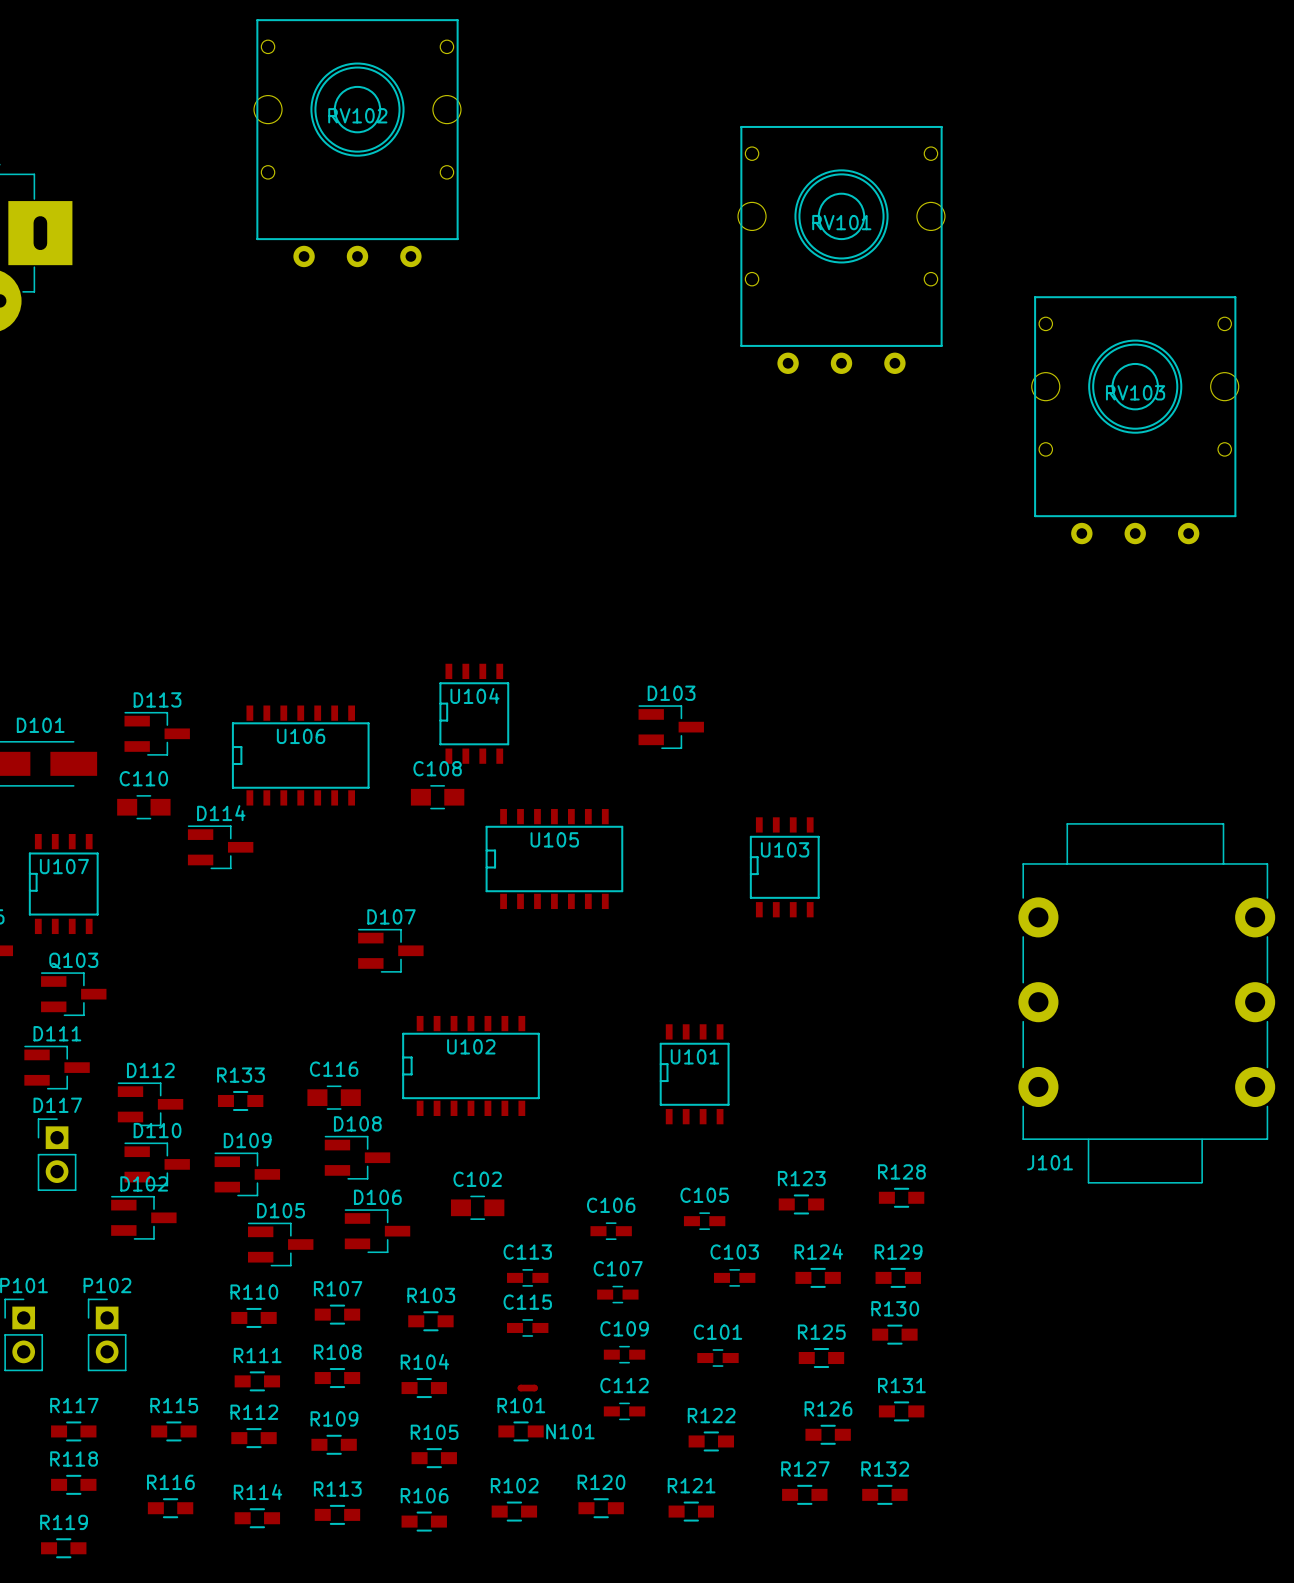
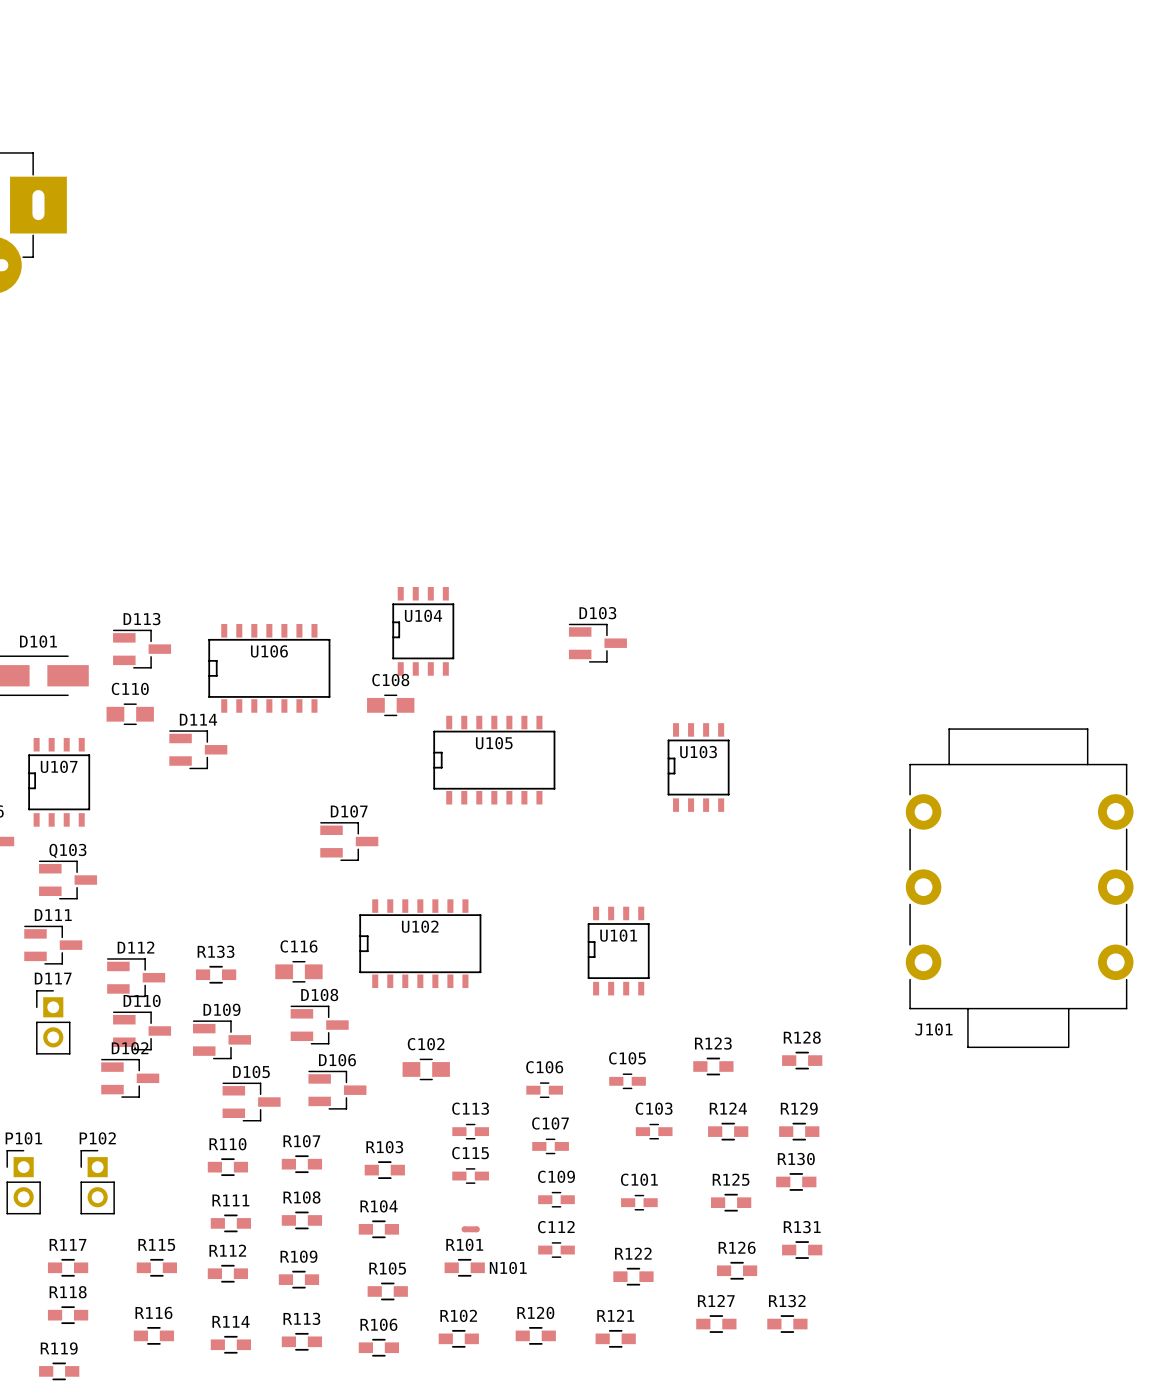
RV102: (357, 143) -> none
RV101: (841, 249) -> none
RV103: (1135, 420) -> none

